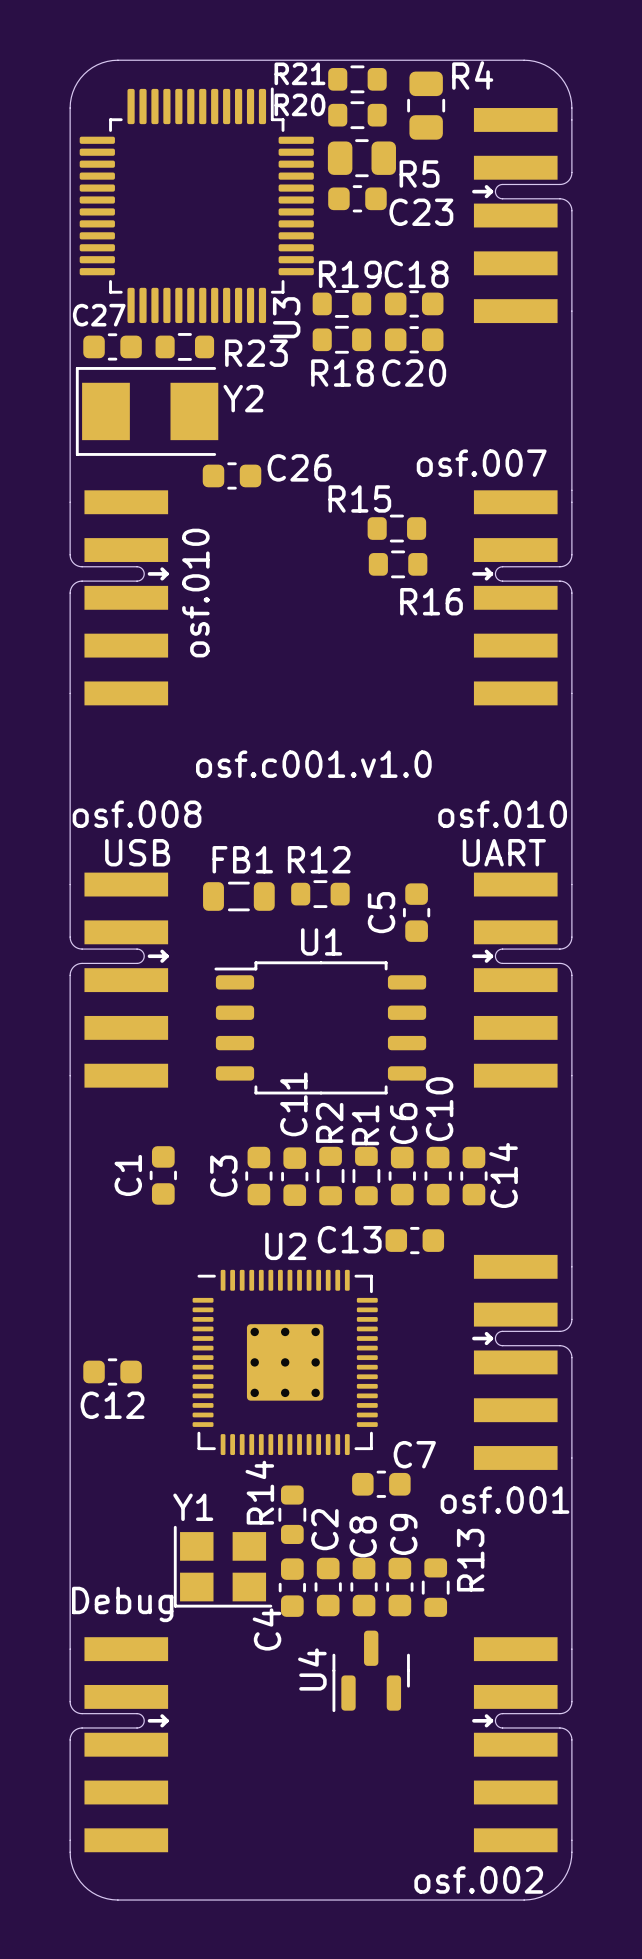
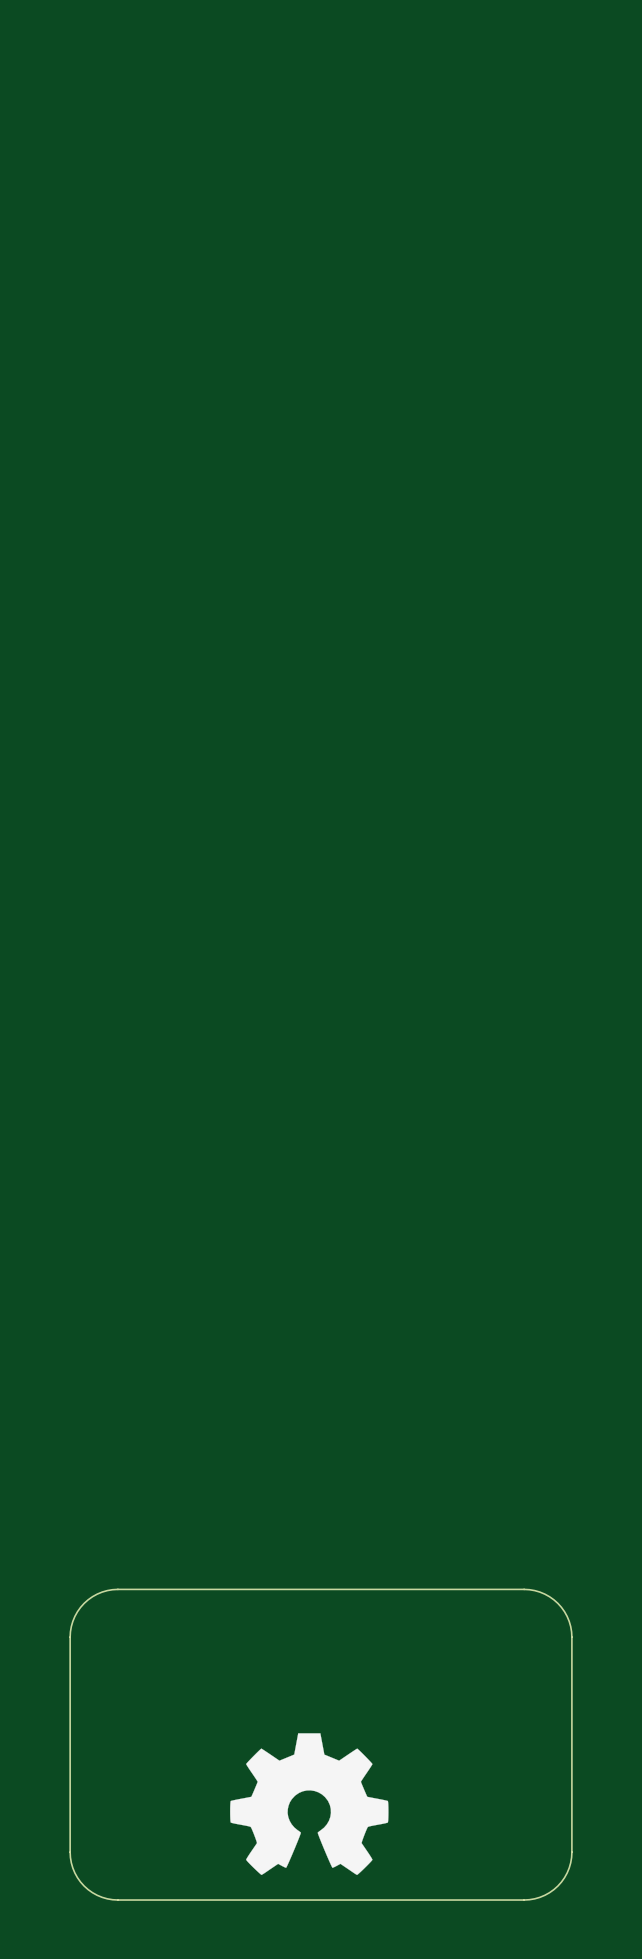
R21: (357, 79) -> none
R4: (426, 105) -> none
R20: (357, 115) -> none
board edge: (571, 119) (570, 97) (561, 78) (544, 64) (529, 60) (117, 60) (102, 62) (88, 70) (74, 87) (70, 108) (70, 502) -> none
R5: (361, 158) -> none
C23: (357, 198) -> none
U3: (196, 205) -> none
part: (522, 215) -> none
R19: (341, 303) -> none
C18: (414, 303) -> none
board edge: (571, 311) (571, 502) -> none
R18: (341, 339) -> none
C20: (414, 339) -> none
C27: (112, 346) -> none
R23: (184, 346) -> none
Y2: (147, 411) -> none
text: osf.007 (481, 463) -> none
C26: (232, 475) -> none
R15: (396, 528) -> none
R16: (398, 564) -> none
text: osf.010 (195, 593) -> none
part: (119, 597) -> none
part: (522, 597) -> none
board edge: (70, 693) (70, 884) -> none
board edge: (571, 693) (571, 884) -> none
text: osf.c001.v1.0 (313, 764) -> none
text: osf.008 (137, 814) -> none
text: osf.010 (502, 814) -> none
text: USB (137, 852) -> none
text: UART (504, 852) -> none
R12: (320, 894) -> none
FB1: (238, 896) -> none
C5: (416, 912) -> none
part: (119, 980) -> none
part: (522, 980) -> none
U1: (320, 1027) -> none
board edge: (70, 1075) (70, 1637) -> none
board edge: (571, 1075) (571, 1266) -> (571, 1649) (571, 1840)
C1: (163, 1175) -> none
C3: (258, 1176) -> none
C11: (294, 1176) -> none
R2: (330, 1176) -> none
R1: (366, 1176) -> none
C6: (402, 1176) -> none
C10: (438, 1176) -> none
C14: (473, 1176) -> none
C13: (414, 1240) -> none
U2: (285, 1362) -> none
part: (522, 1362) -> none
C12: (112, 1371) -> none
board edge: (571, 1457) (571, 1637) -> (70, 1637) (74, 1616) (84, 1603) (97, 1594) (117, 1589) (529, 1589) (544, 1594) (557, 1603) (567, 1616) (571, 1637)
C7: (381, 1484) -> none
text: osf.001 (505, 1500) -> none
R14: (292, 1514) -> none
Y1: (223, 1566) -> none
C4: (292, 1587) -> none
C2: (328, 1587) -> none
C8: (364, 1587) -> none
C9: (399, 1587) -> none
R13: (435, 1587) -> none
text: Debug (122, 1604) -> none
board edge: none -> (70, 1649) (70, 1840)
U4: (371, 1671) -> none
drawing: none -> [230, 1733, 389, 1876]
part: (119, 1744) -> none
part: (522, 1744) -> none
text: osf.002 (478, 1880) -> none

